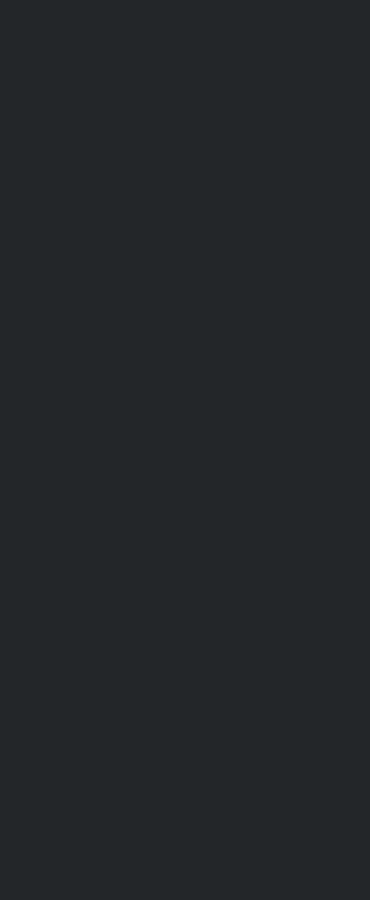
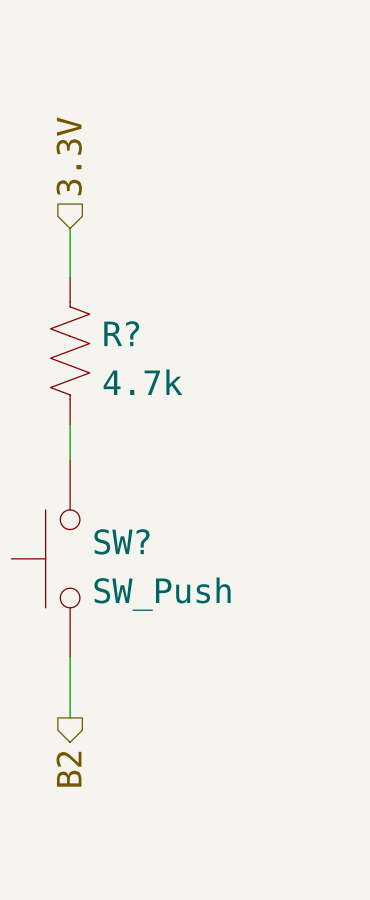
hierarchical label: none -> 3.3V (69, 156)
wire: none -> (70, 228) (70, 277)
R?: none -> 4.7k (70, 350)
wire: none -> (70, 424) (70, 460)
SW?: none -> SW_Push (45, 558)
wire: none -> (70, 656) (70, 717)
hierarchical label: none -> B2 (68, 769)

